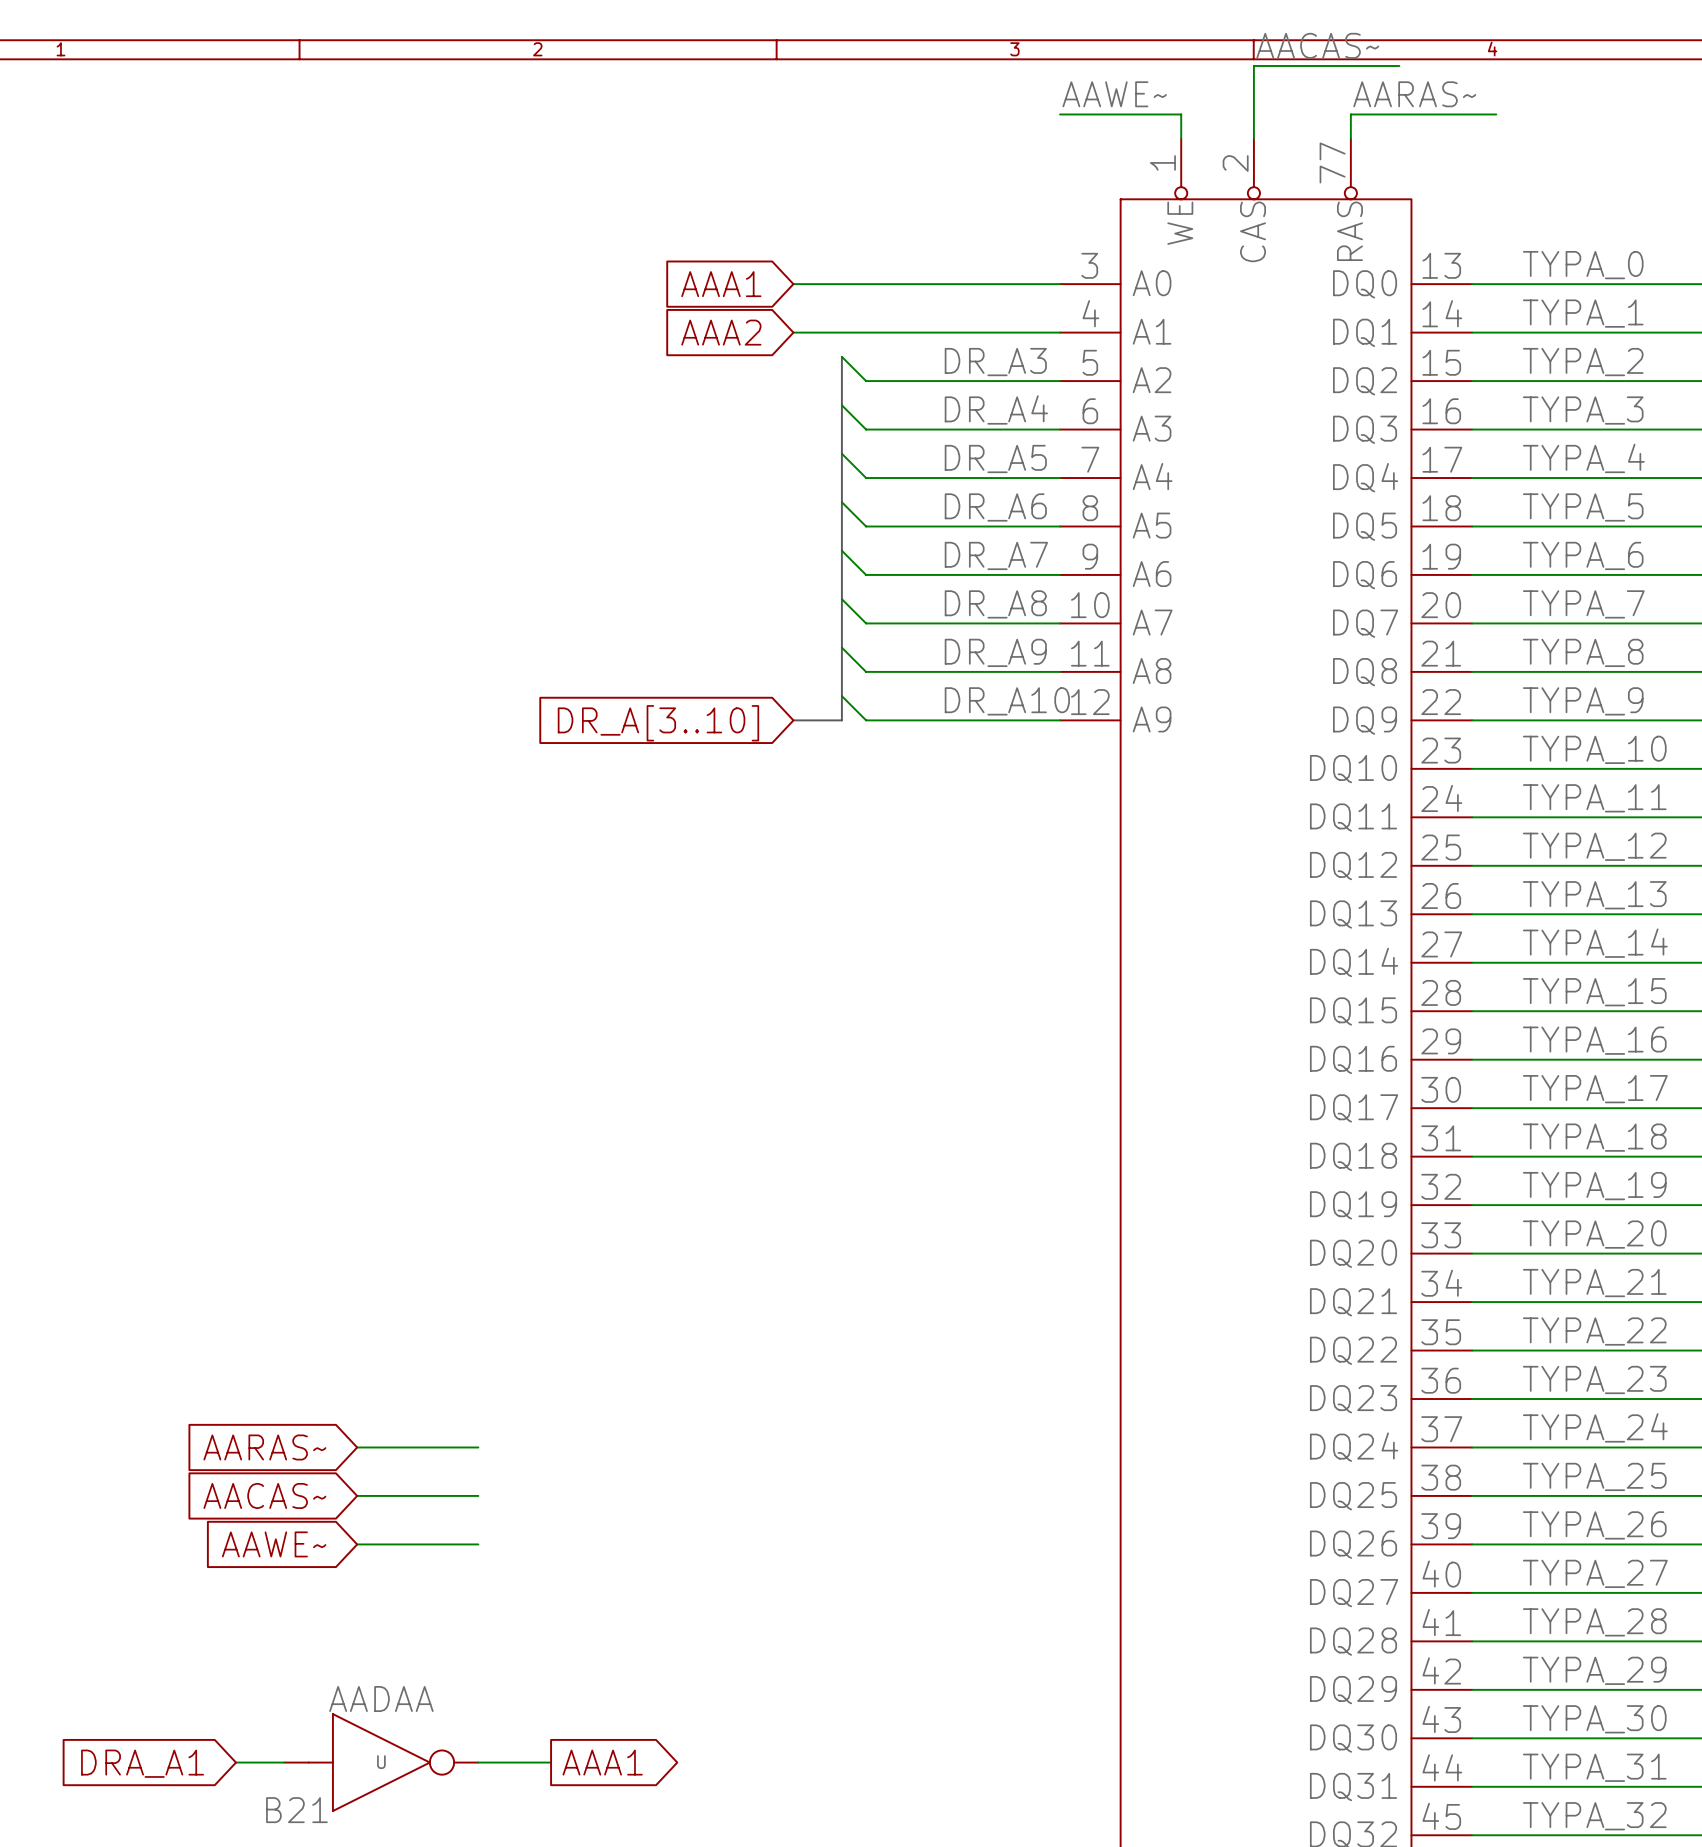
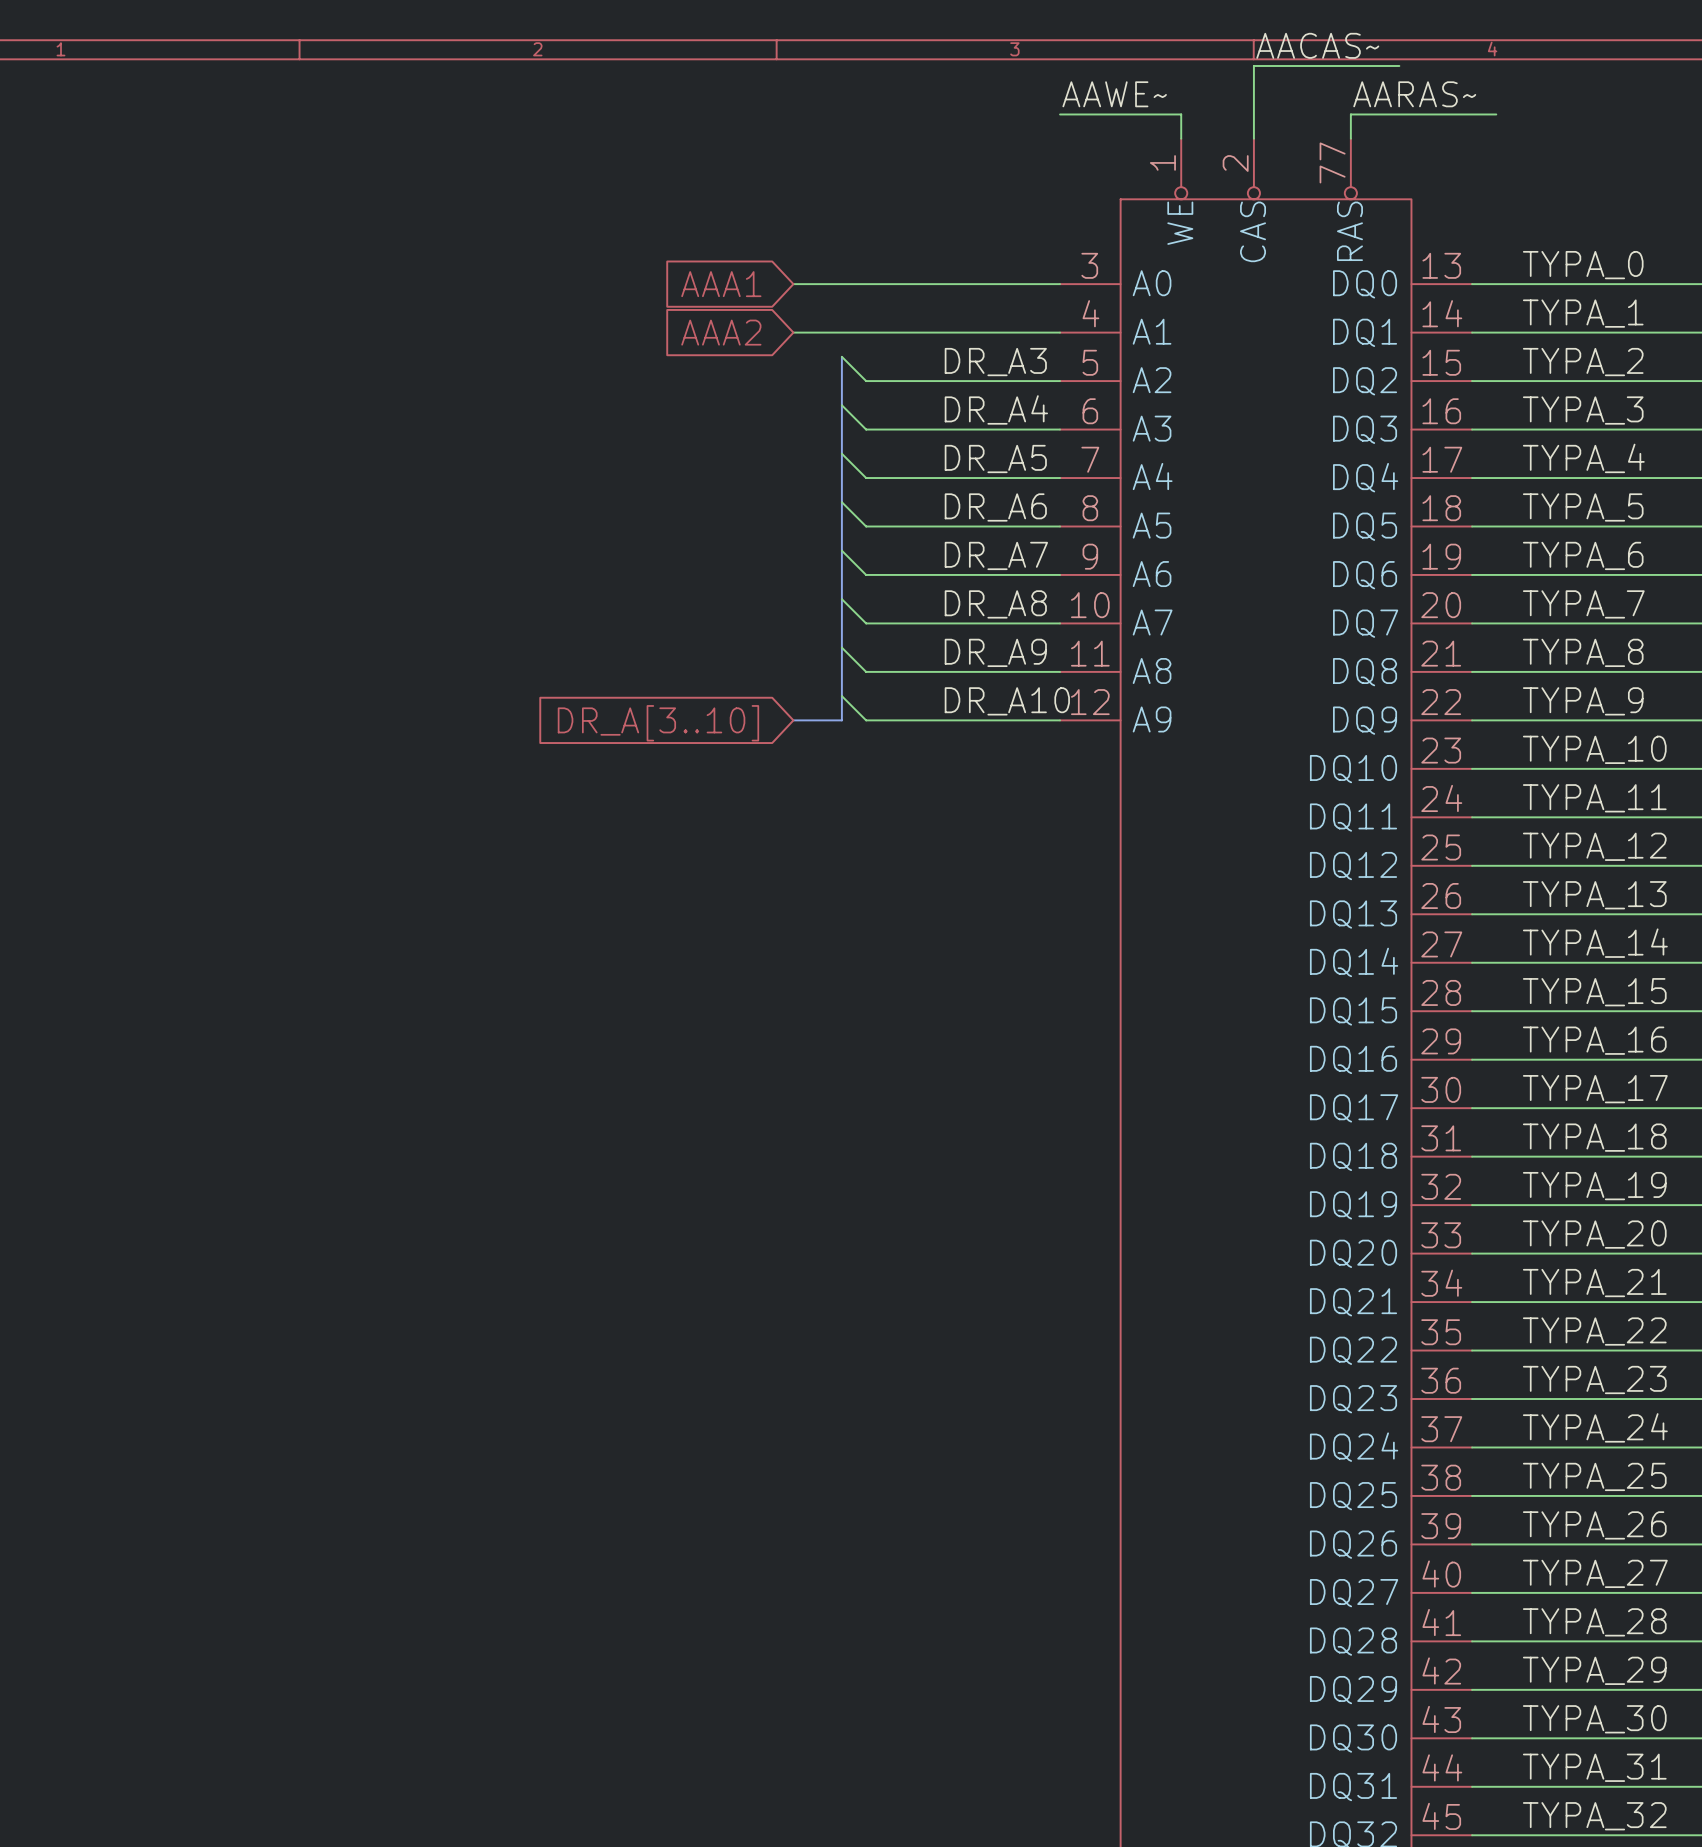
global label: AARAS~ (264, 1447) -> none
wire: (357, 1447) (478, 1447) -> none
global label: AACAS~ (264, 1495) -> none
wire: (357, 1495) (478, 1495) -> none
global label: AAWE~ (274, 1544) -> none
wire: (357, 1544) (478, 1544) -> none
wire: (235, 1762) (284, 1762) -> none
U: (381, 1762) -> none
wire: (478, 1762) (551, 1762) -> none
global label: AAA1 (602, 1762) -> none
global label: DRA_A1 (142, 1763) -> none

